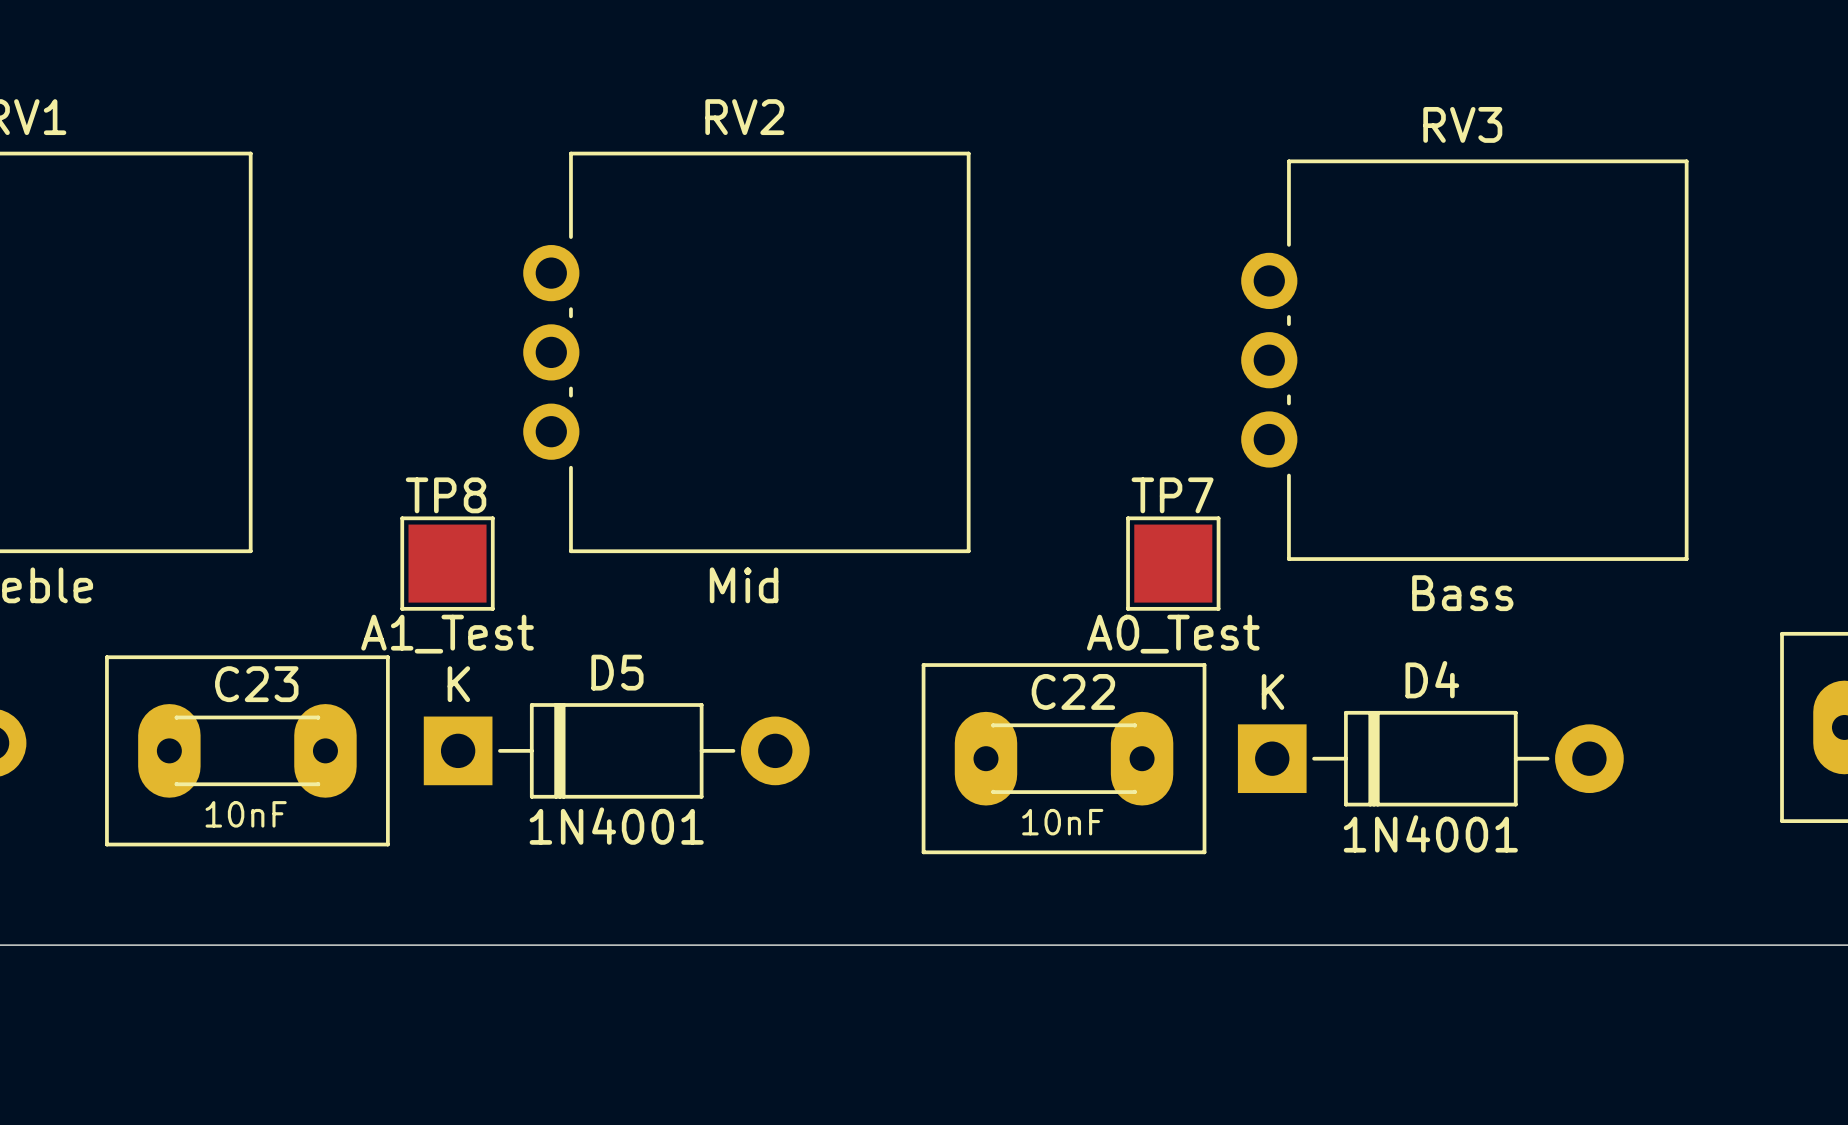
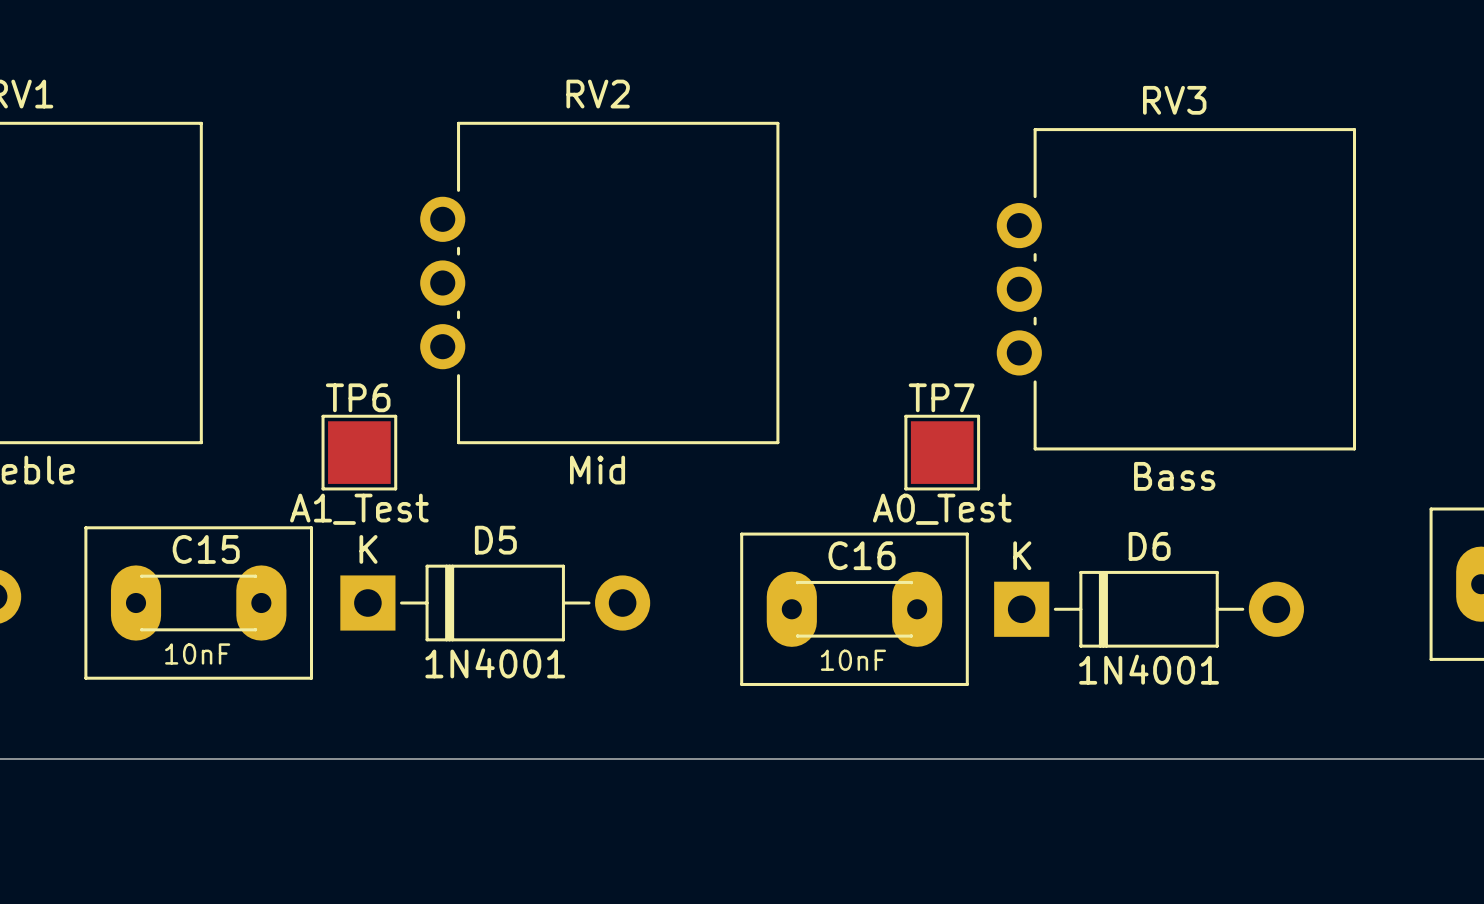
TP8 name: TP8 (446, 495) -> TP6 (358, 397)
D4 name: D4 (1432, 679) -> D6 (1149, 546)
C23 name: C23 (256, 684) -> C15 (206, 549)
C22 name: C22 (1073, 691) -> C16 (862, 555)

